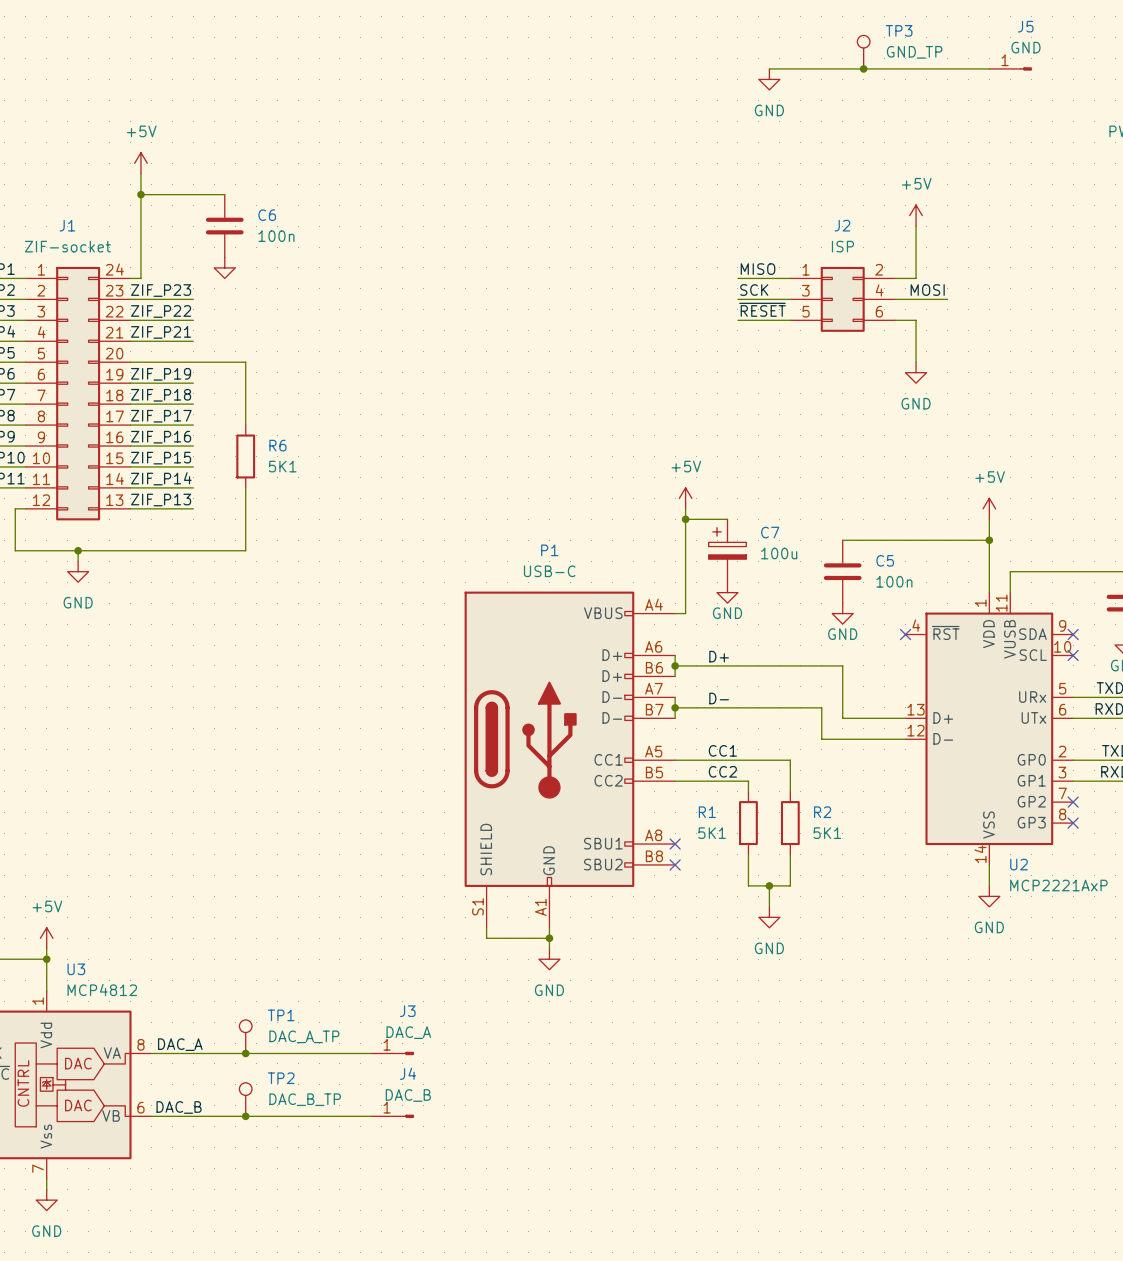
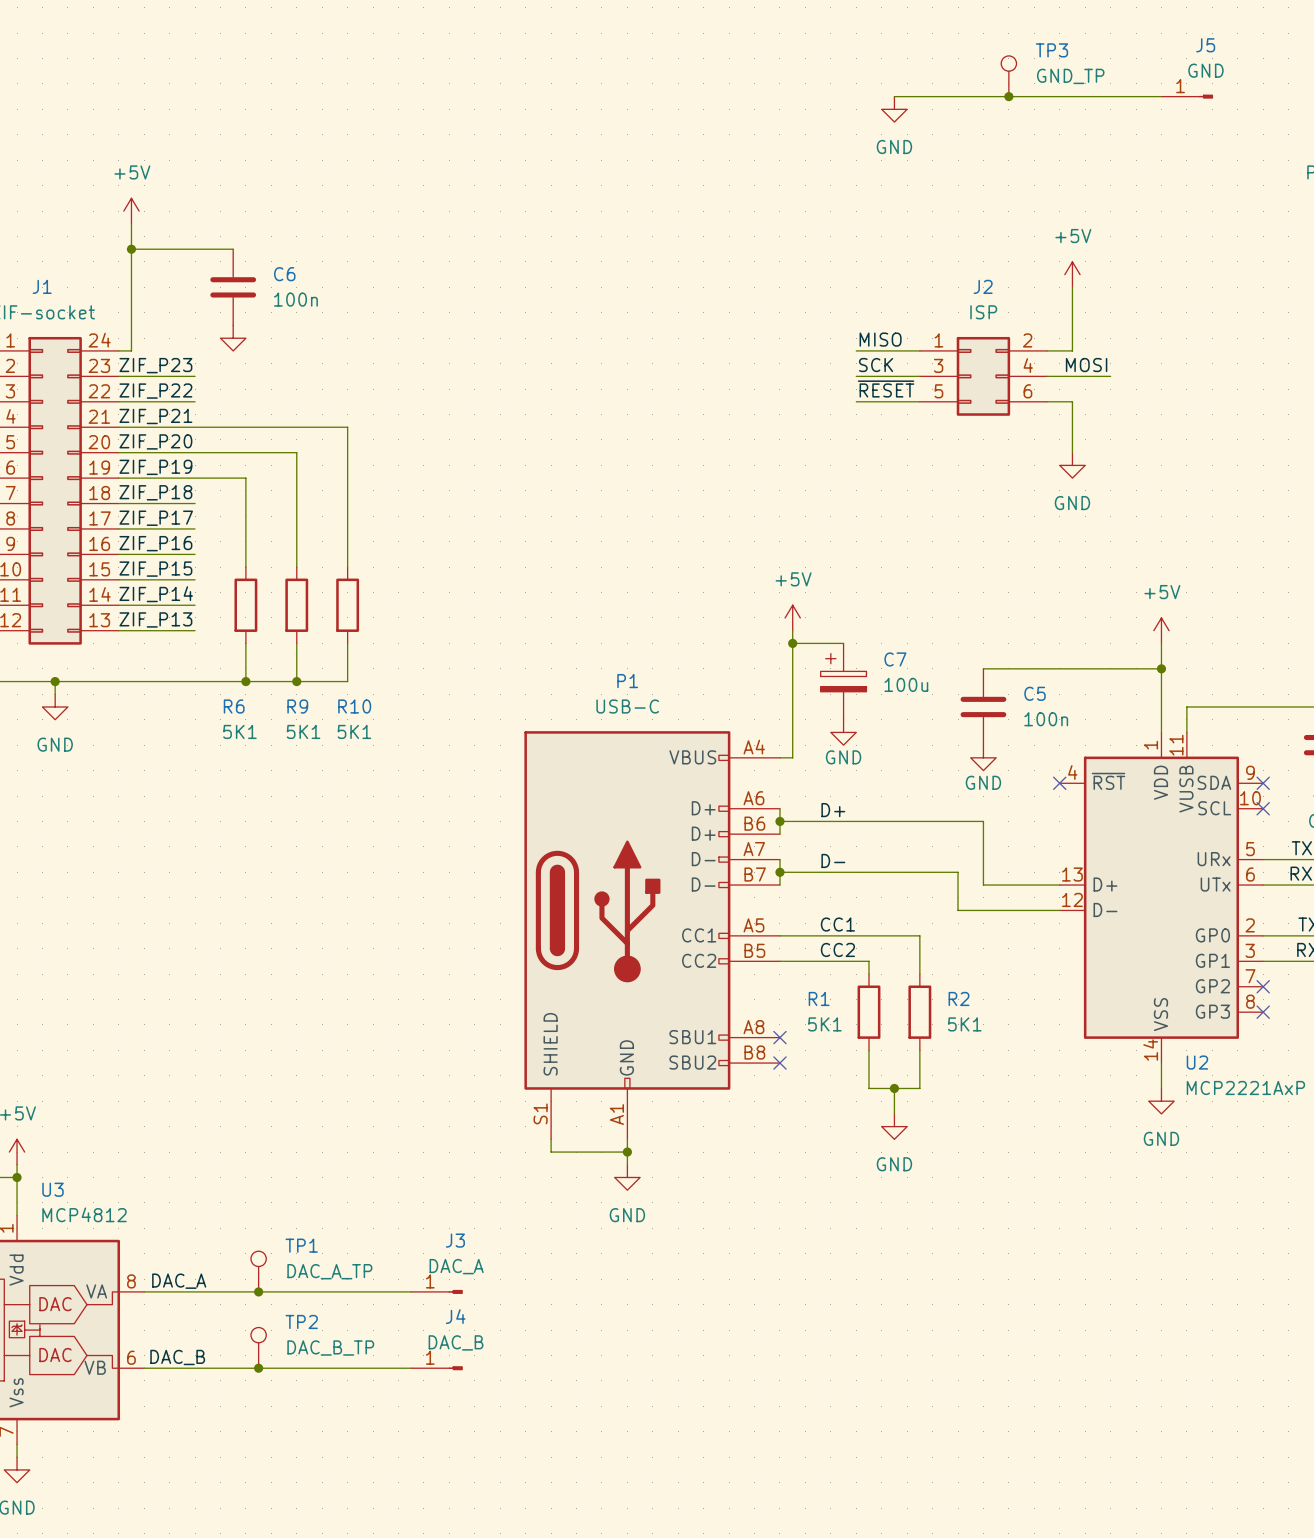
wire: none -> (195, 427) (347, 427) (347, 567)
label: none -> ZIF_P20 (155, 441)
wire: (245, 362) (245, 425) -> (258, 452) (296, 452) (296, 567)
wire: none -> (195, 478) (245, 478) (245, 567)
R6 name position: R6 (277, 445) -> R6 (234, 706)
R6 position: (245, 456) -> (245, 605)
R6 value position: 5K1 (282, 466) -> 5K1 (239, 731)
wire: (245, 487) (245, 550) -> (347, 643) (347, 681) (258, 681)
R9: none -> 5K1 (296, 605)
R10: none -> 5K1 (347, 605)
wire: none -> (245, 643) (245, 681)
wire: none -> (296, 643) (296, 681)
junction: none -> (245, 681)
junction: none -> (296, 681)

